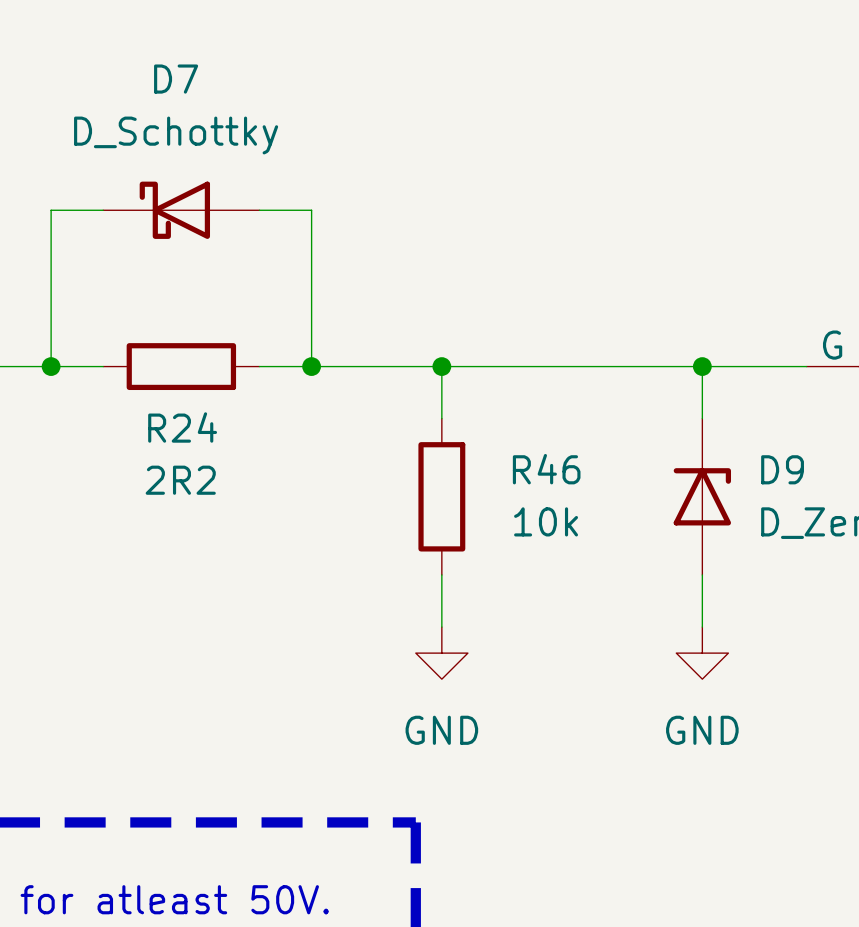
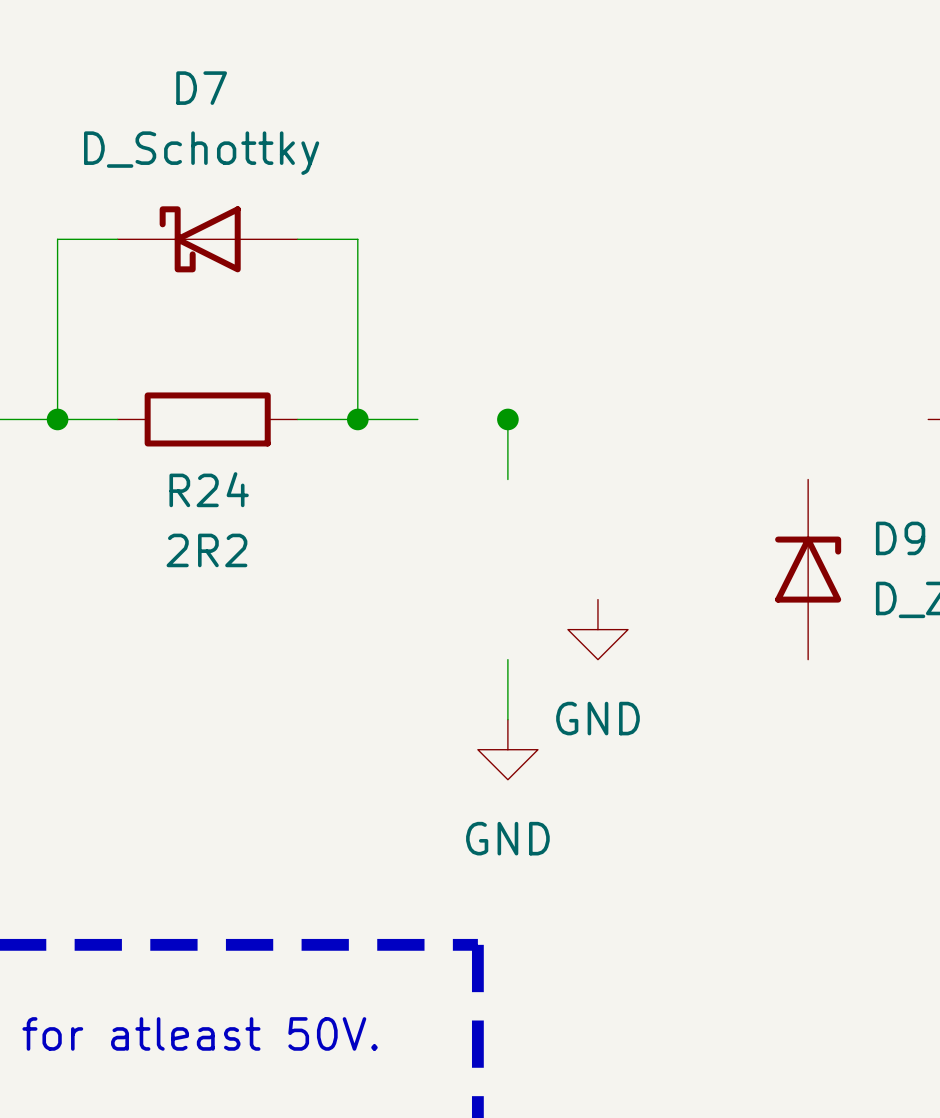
wire: (363, 366) (806, 366) -> none
wire: (702, 366) (702, 418) -> none
junction: (702, 366) -> none
R46: 10k (441, 496) -> none
wire: (702, 574) (702, 627) -> none
power symbol position: GND (702, 653) -> GND (597, 629)

